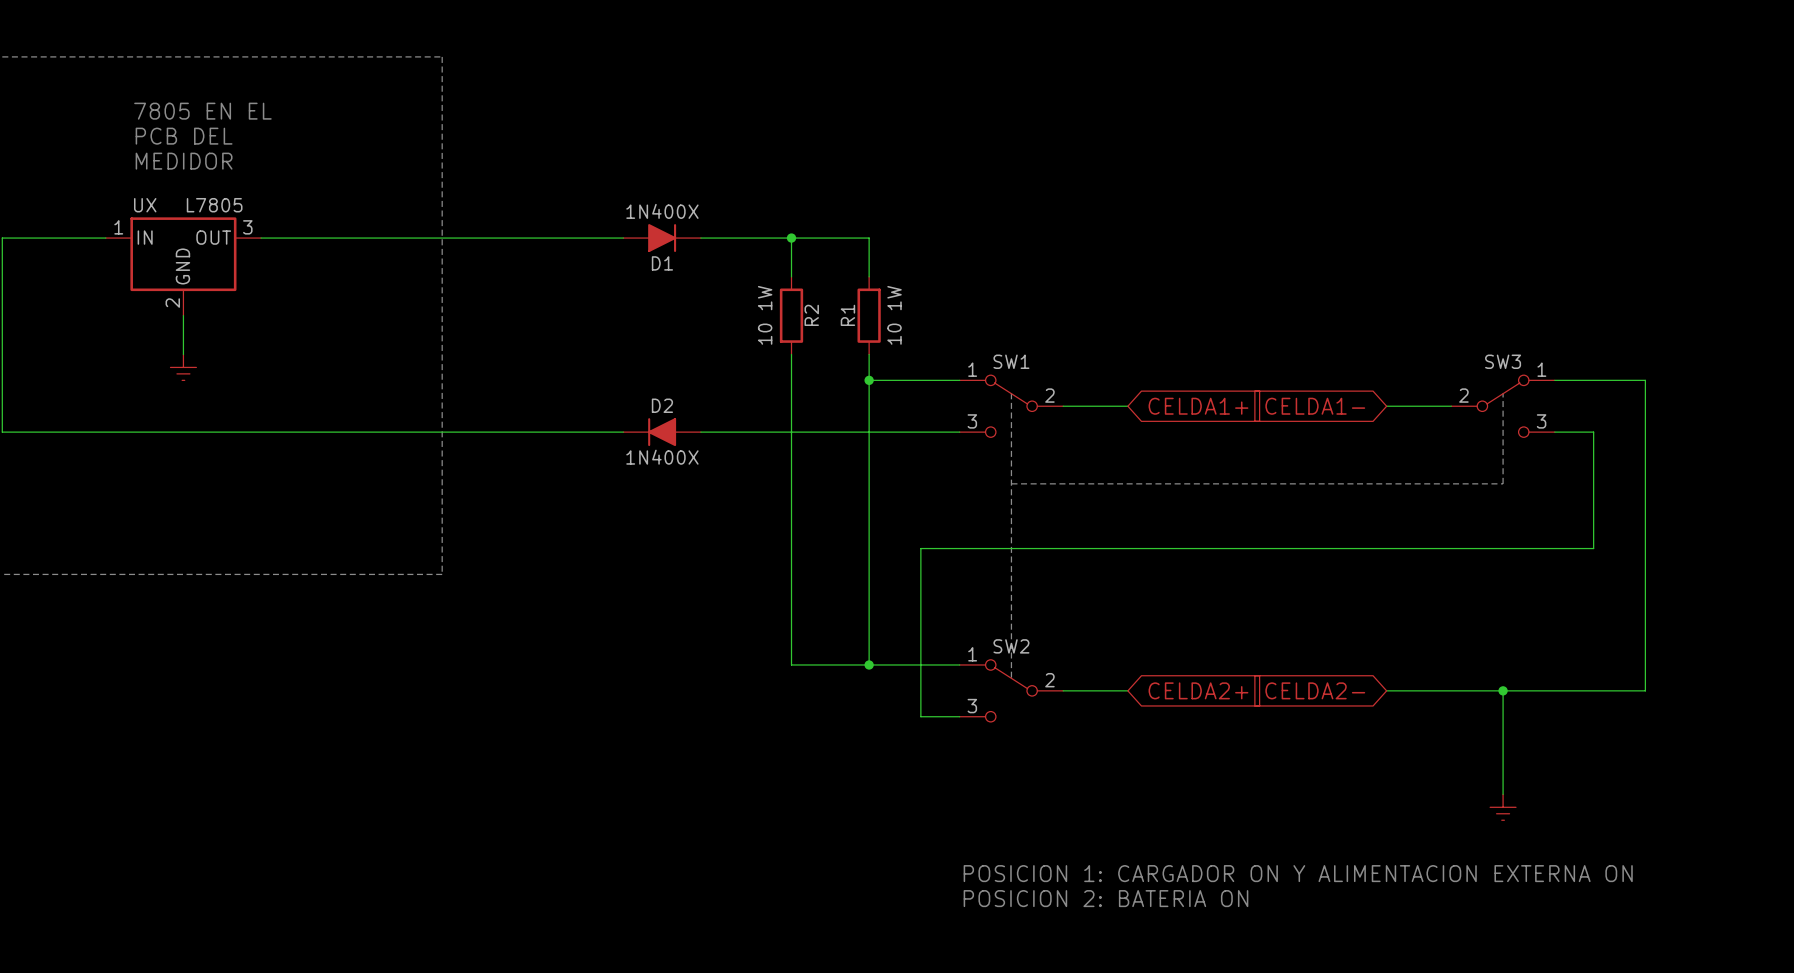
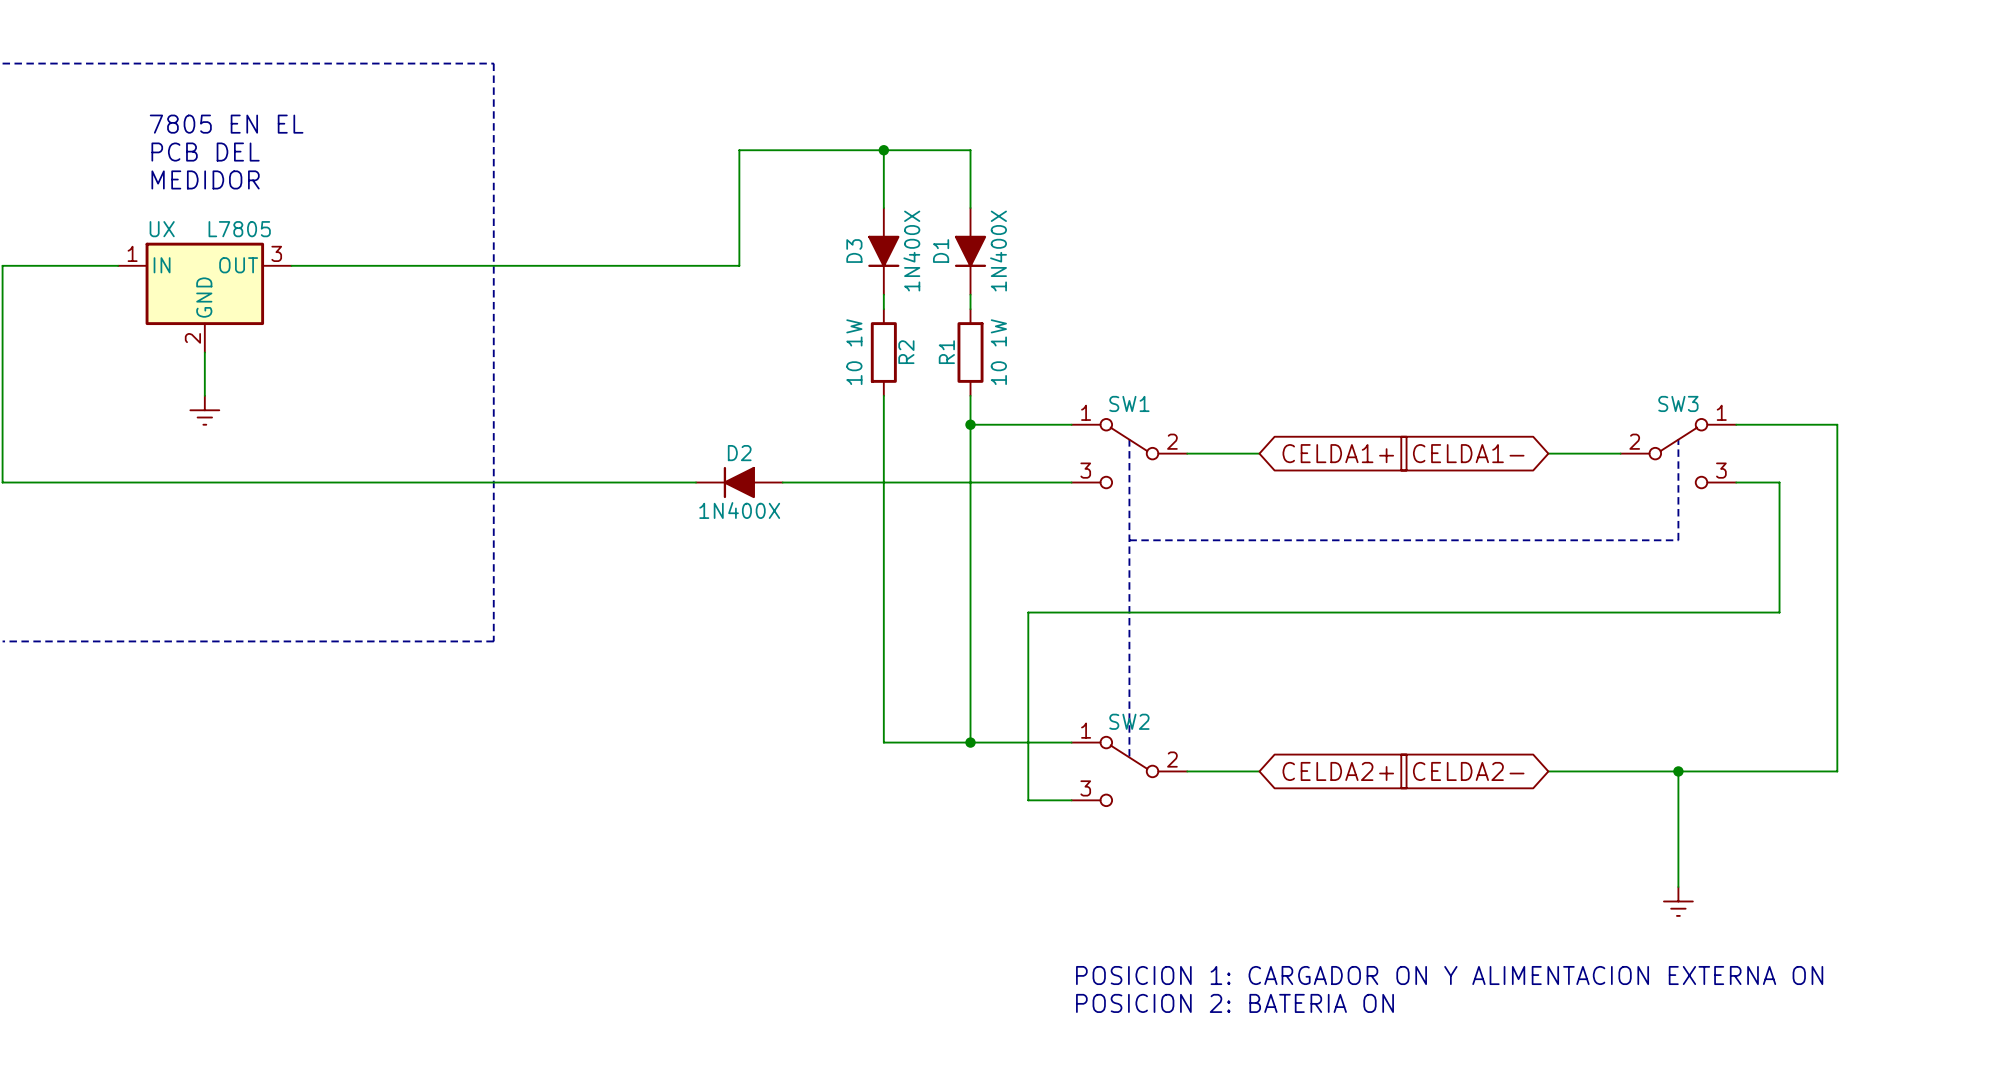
wire: none -> (883, 150) (883, 208)
junction: none -> (883, 150)
wire: none -> (970, 208) (970, 150) (739, 150) (739, 265) (696, 265)
D3: none -> 1N400X (883, 251)
D1 rotation: 0° (662, 238) -> 90° clockwise (970, 251)
D1 position: (662, 238) -> (970, 251)
wire: (700, 238) (869, 238) (869, 263) -> none
junction: (791, 238) -> none

